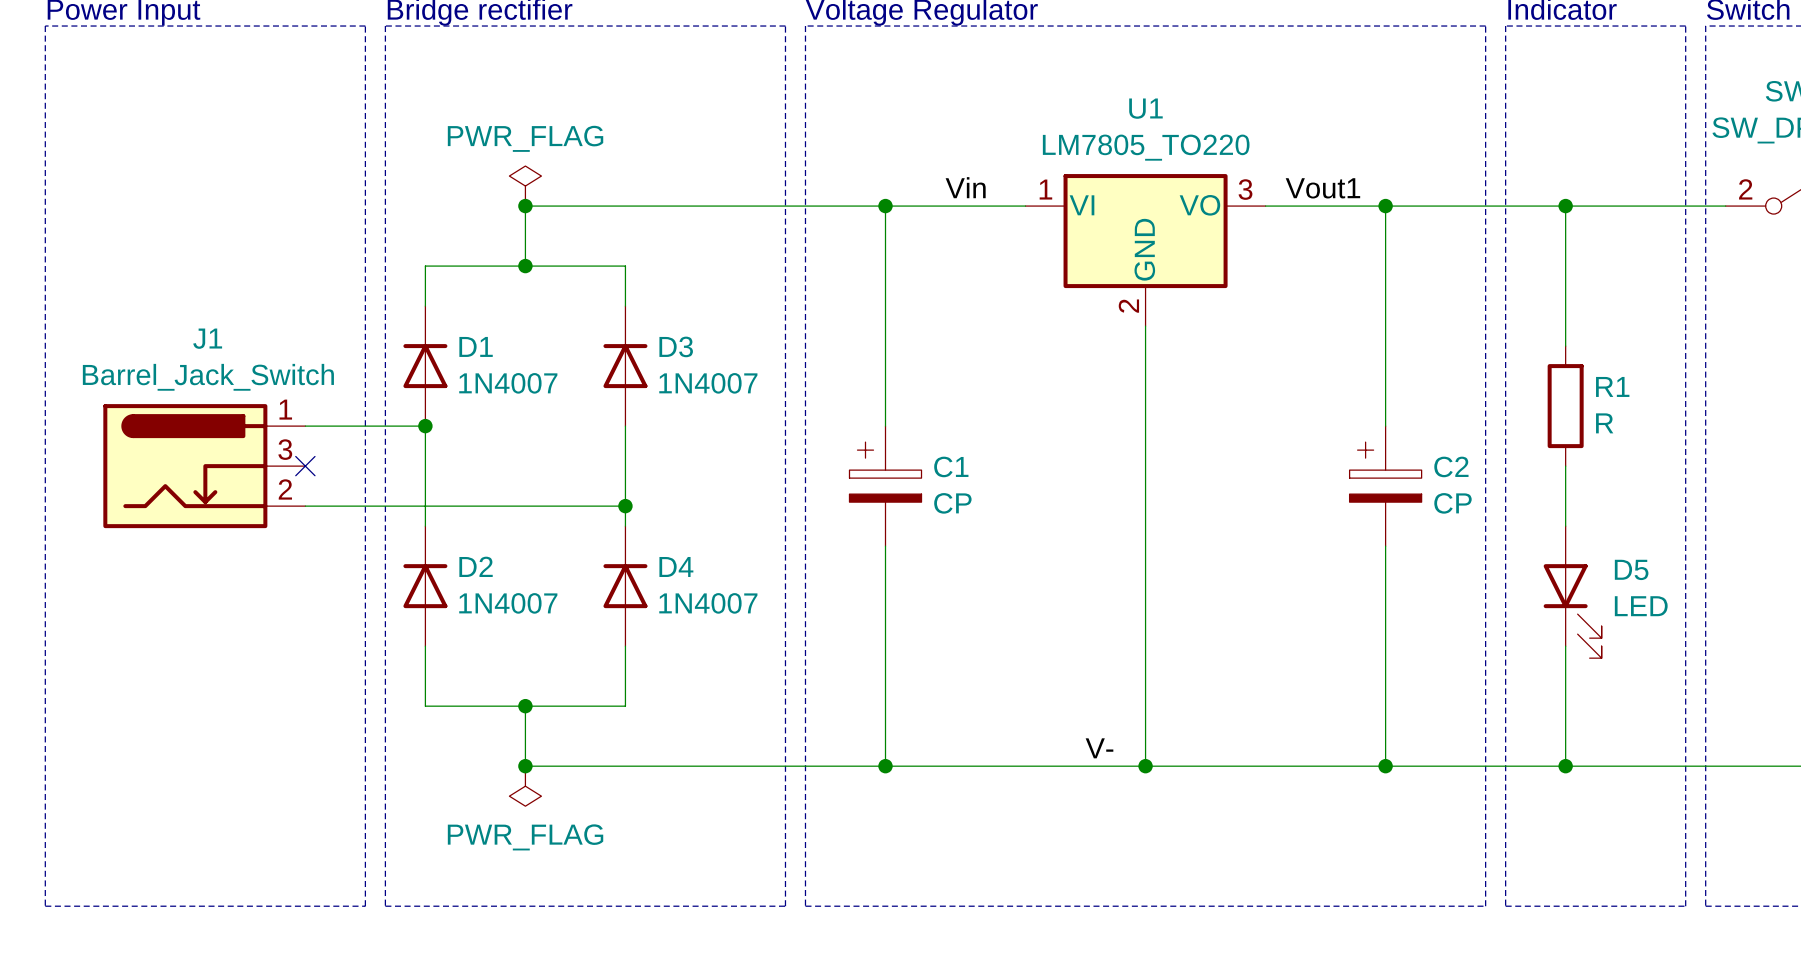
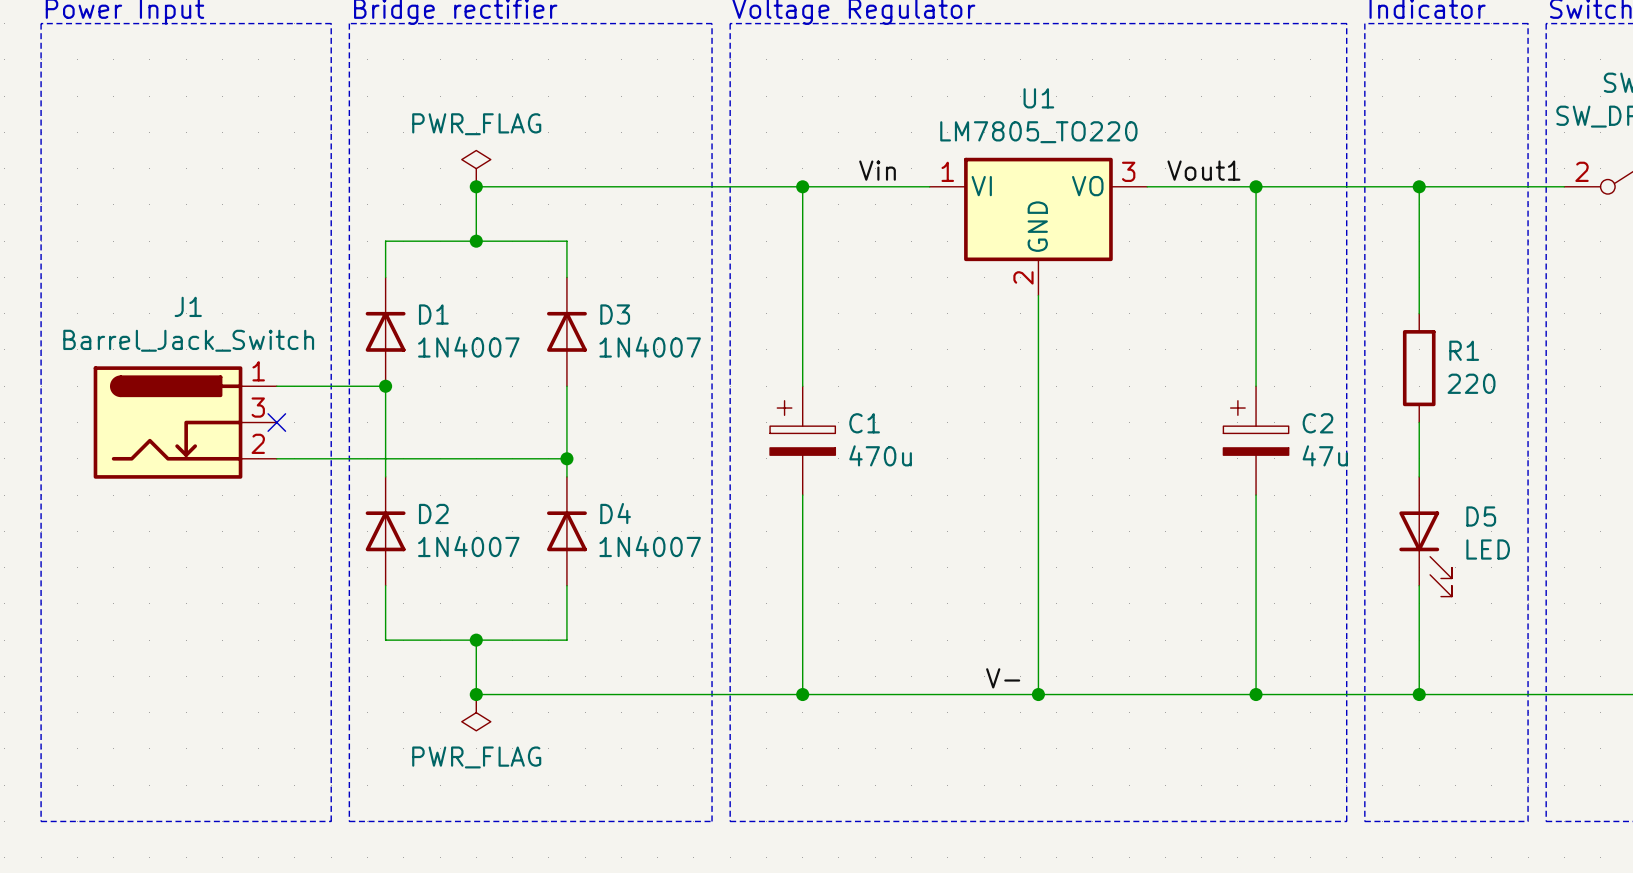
R1 value: R (1604, 423) -> 220 (1471, 383)
C1 value: CP (952, 503) -> 470u (880, 455)
C2 value: CP (1452, 503) -> 47u (1325, 455)

